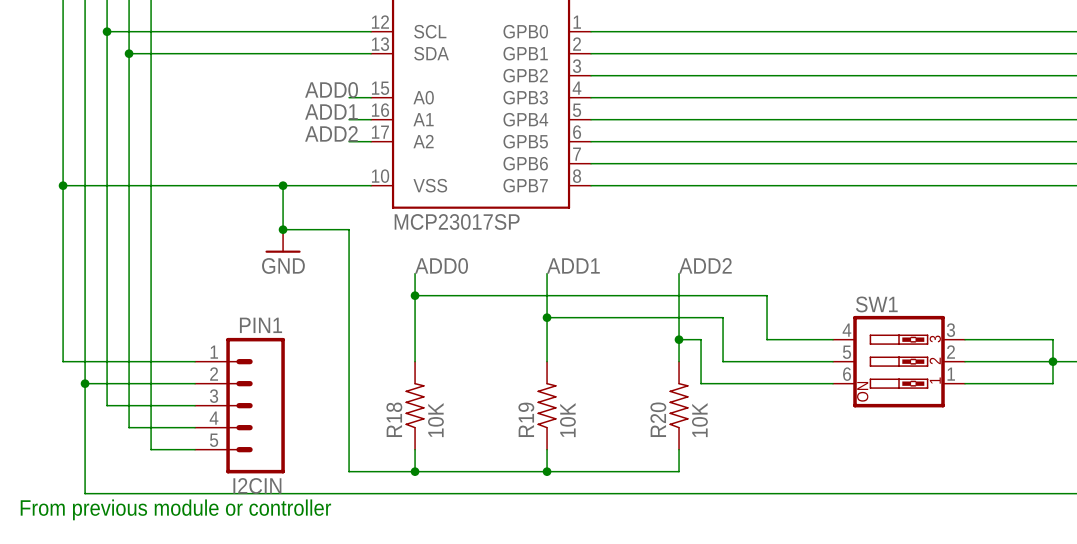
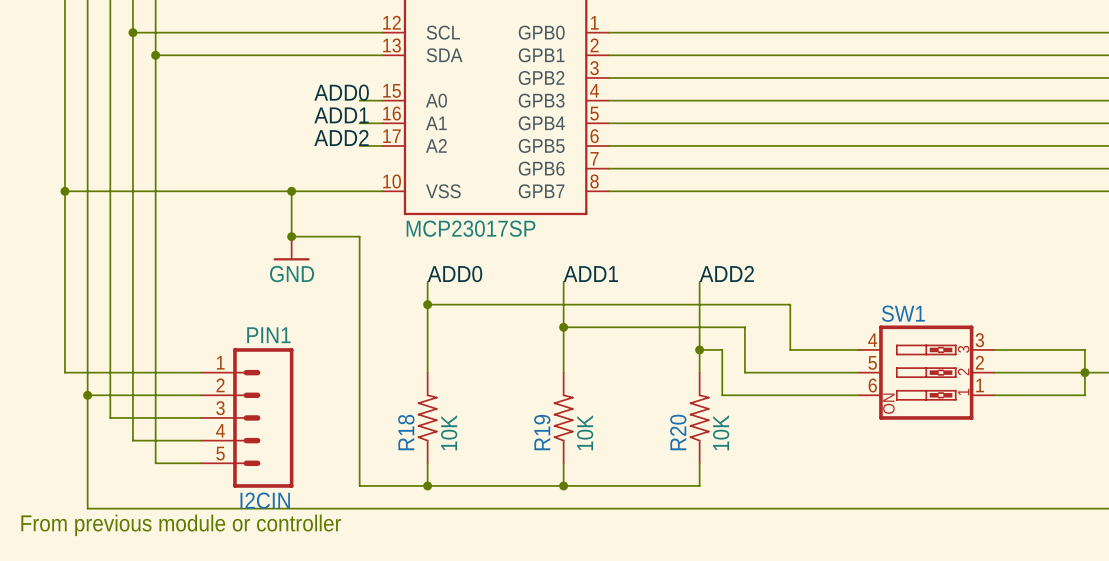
wire: (107, 31) (129, 31) -> none
junction: (107, 31) -> none
junction: none -> (132, 32)
wire: (129, 53) (151, 53) -> none
junction: (129, 53) -> none
junction: none -> (155, 55)

